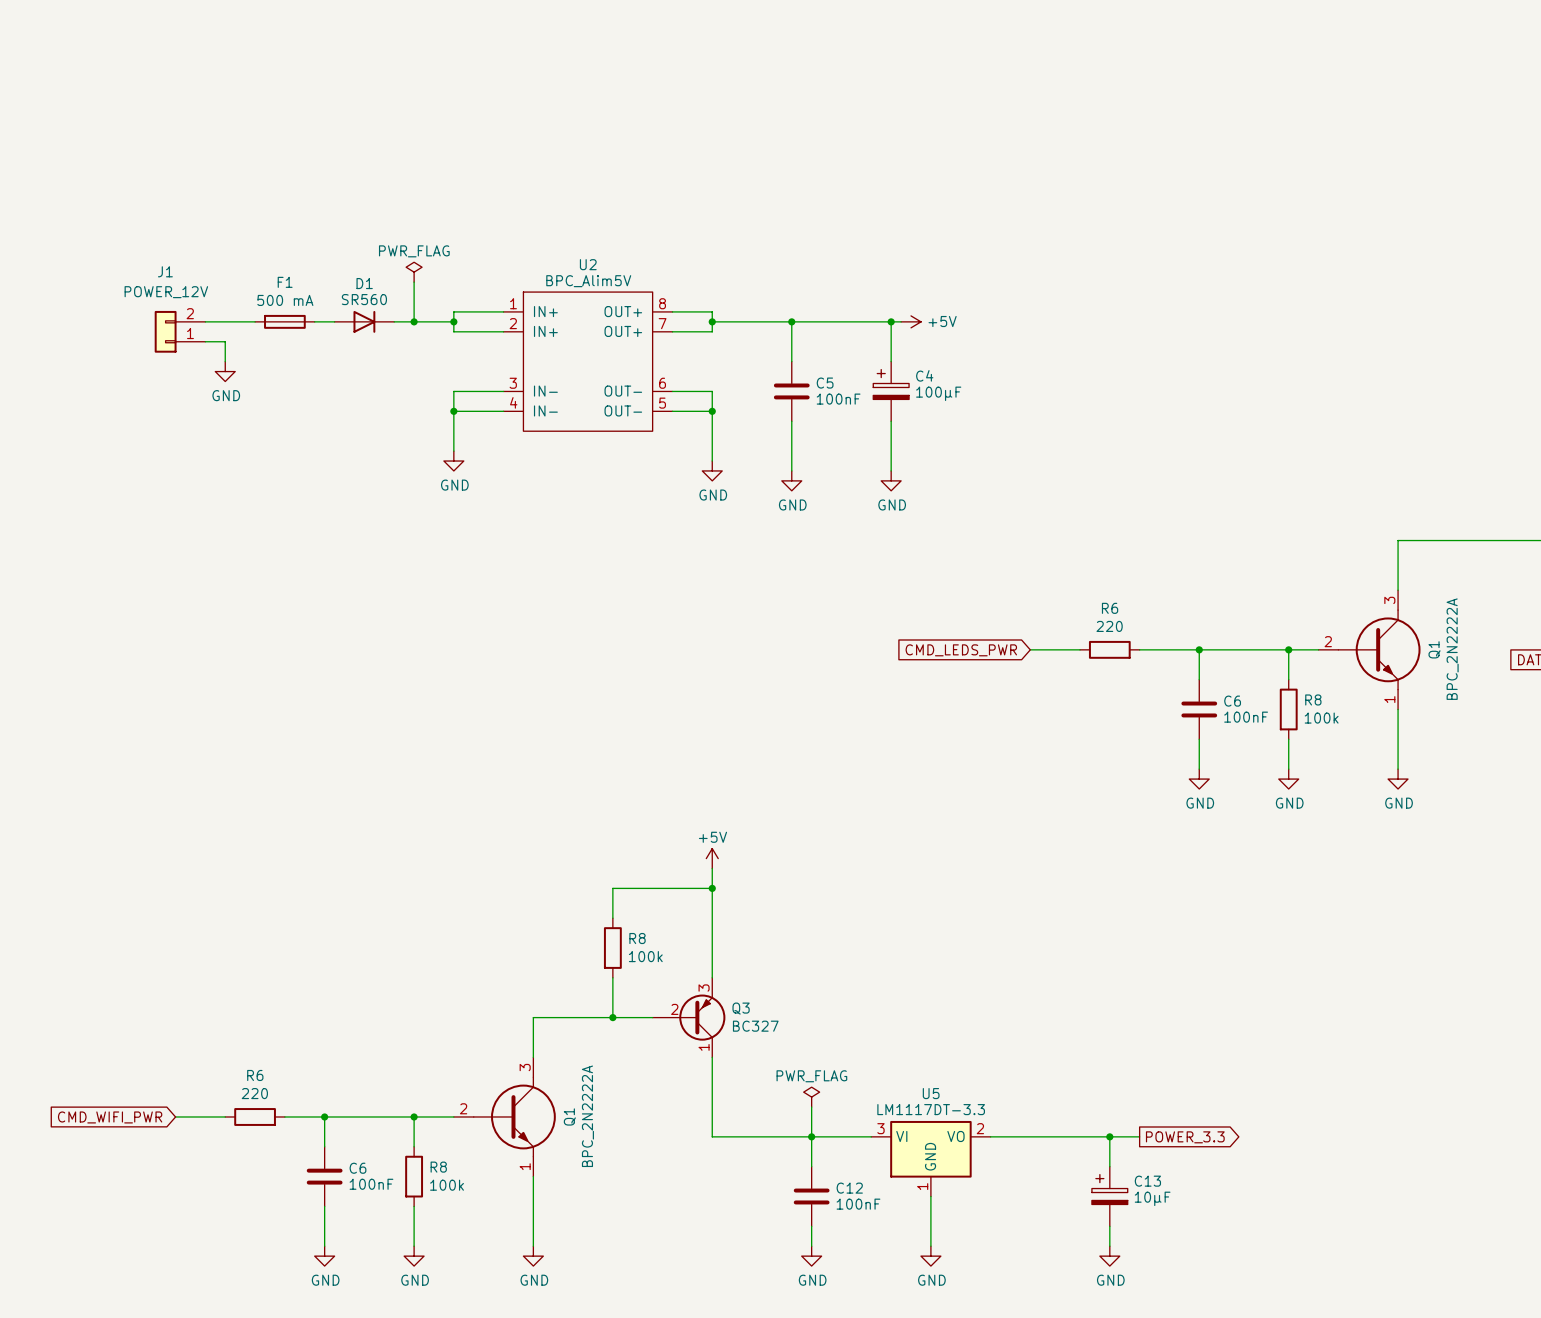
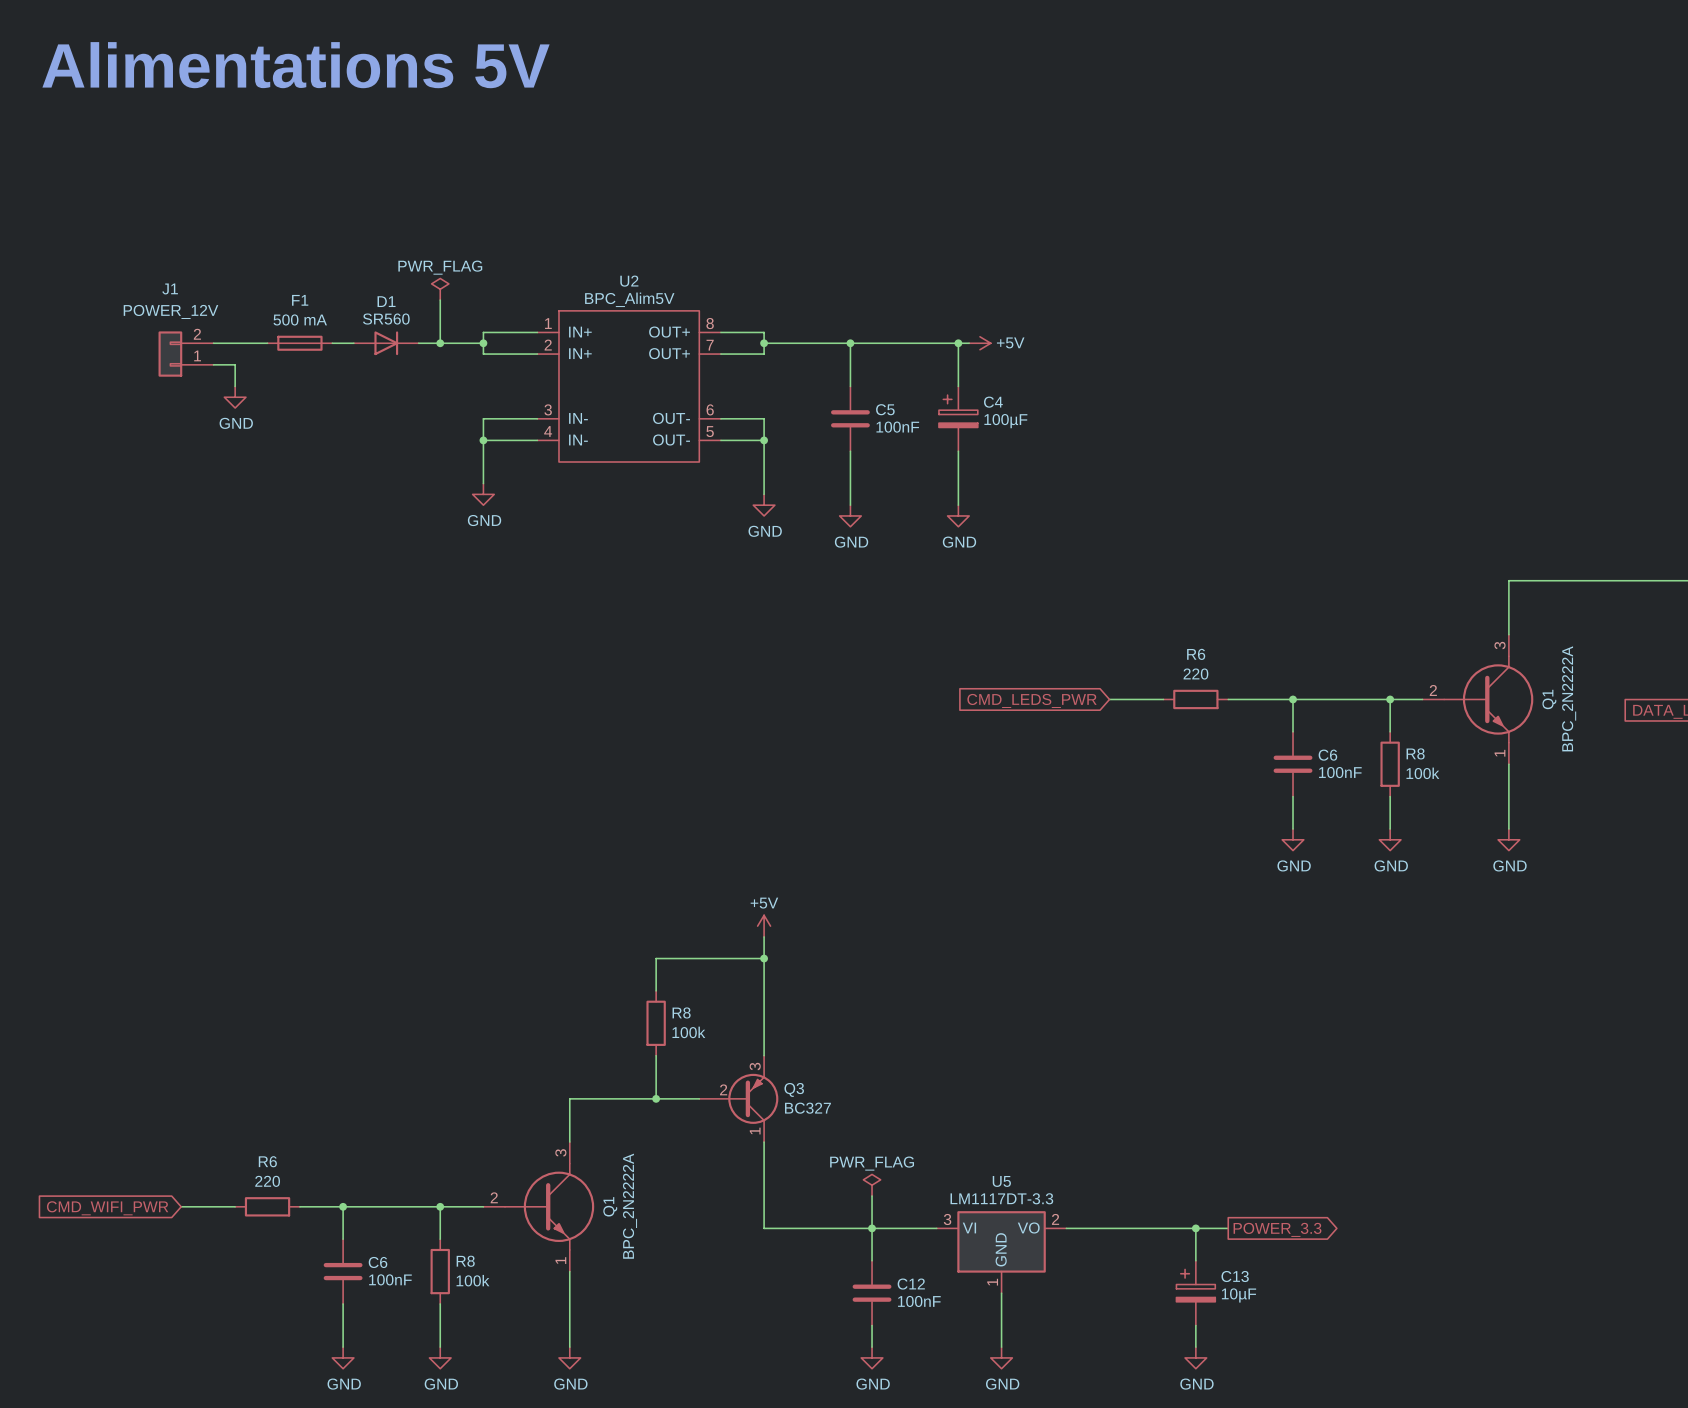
text: none -> Alimentations 5V (296, 65)

